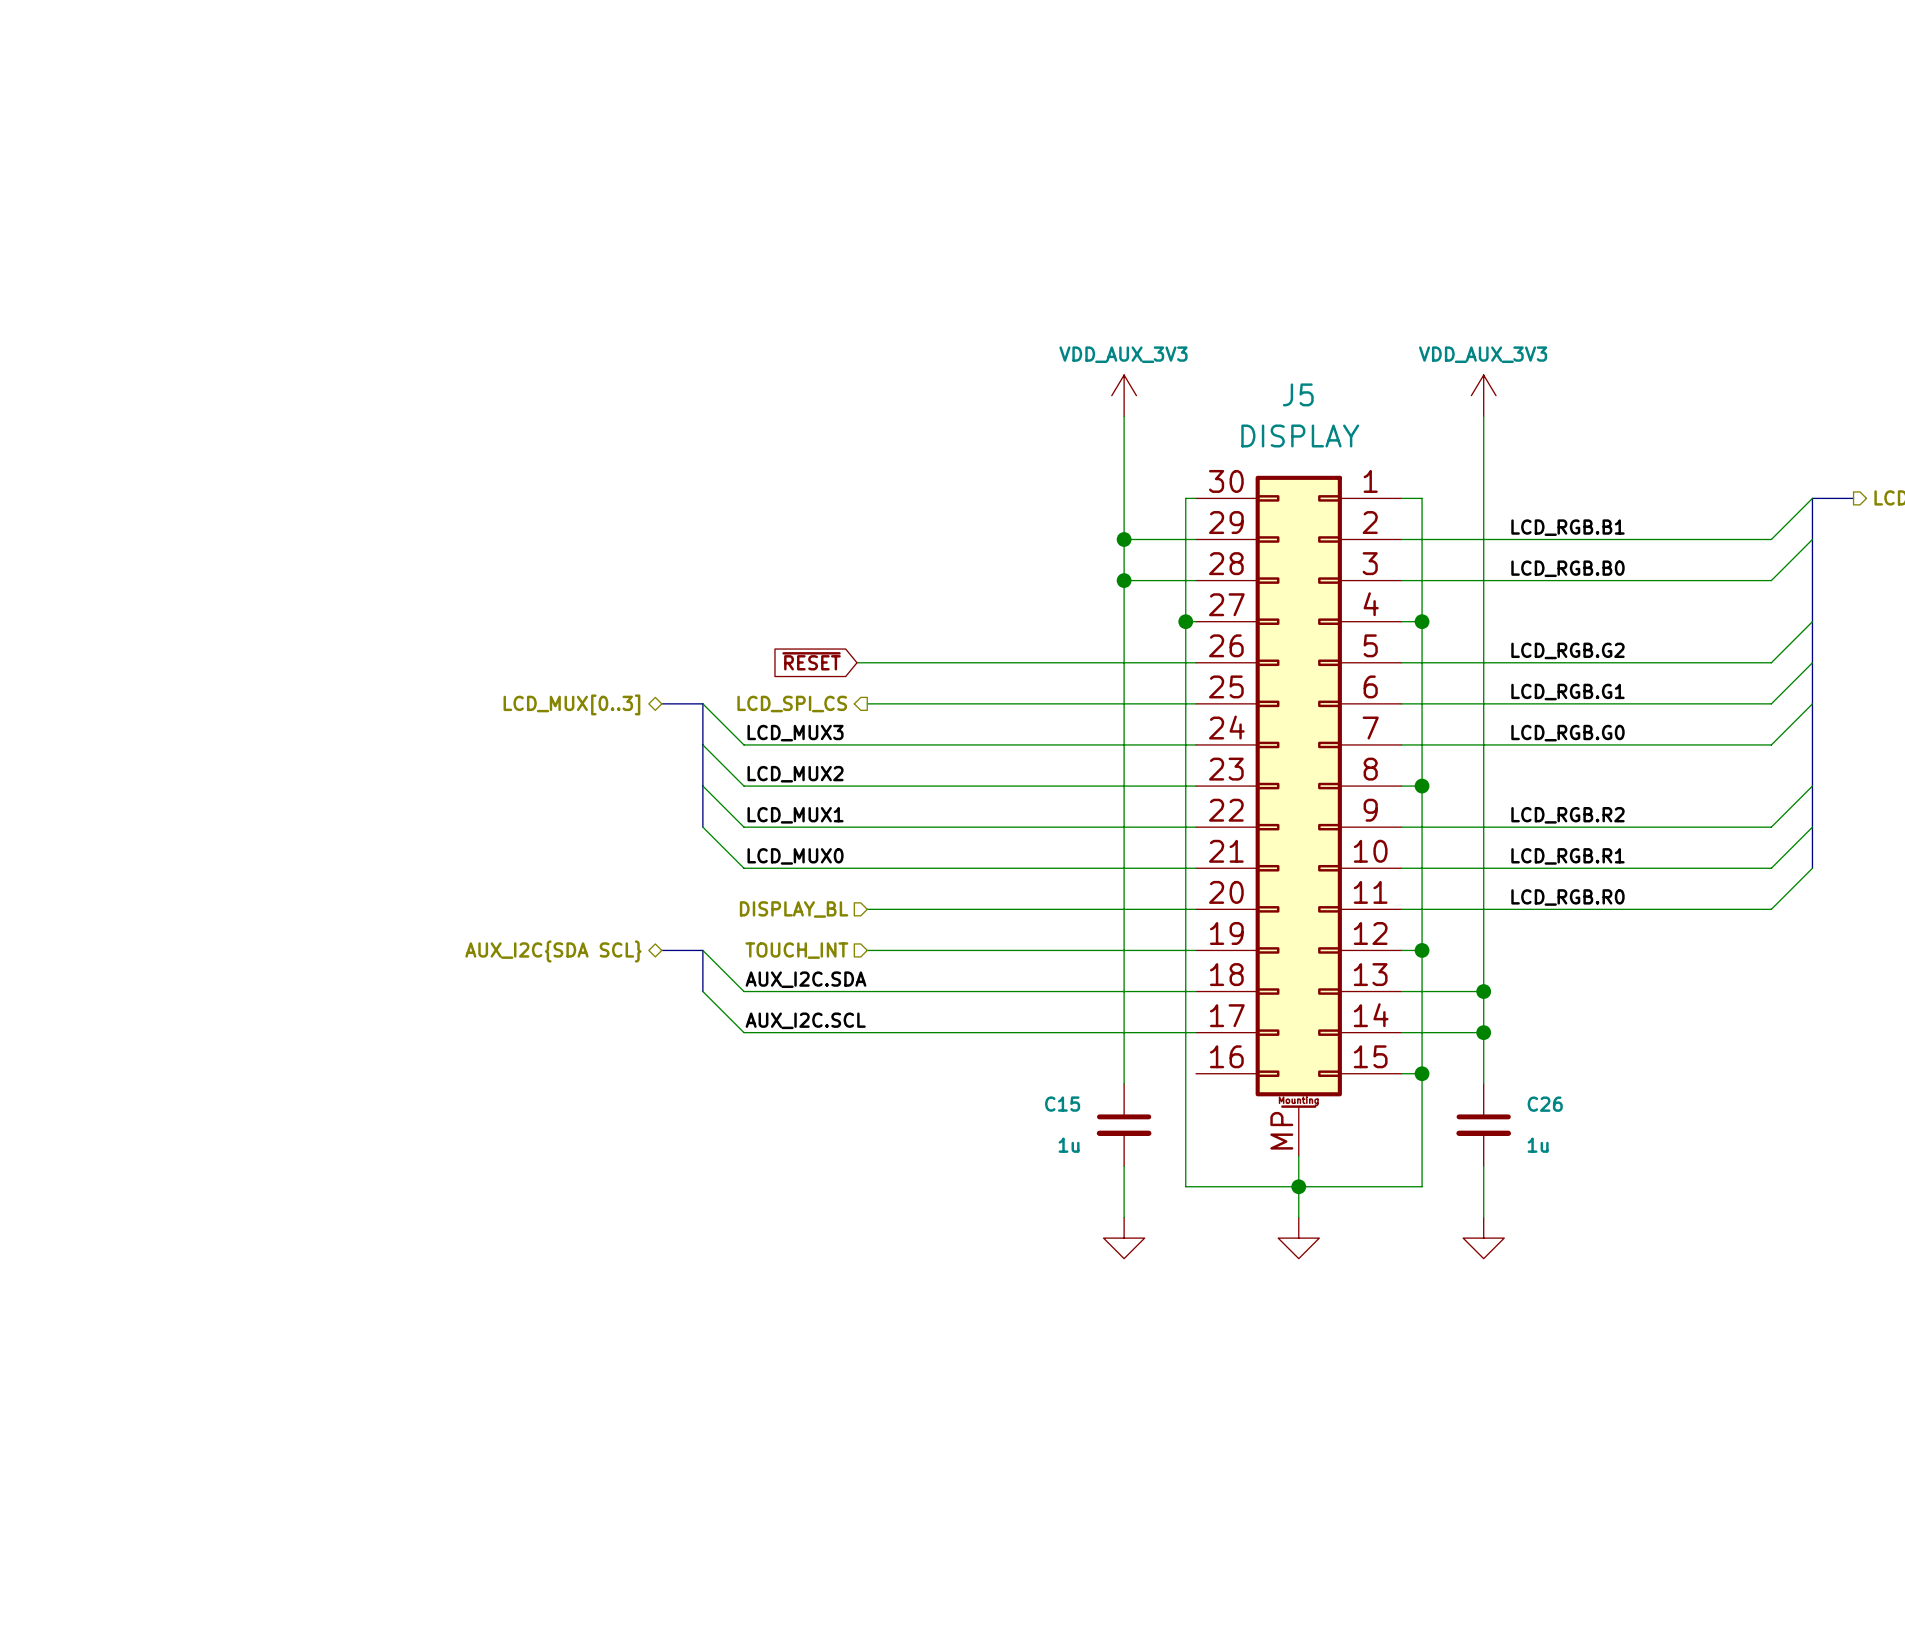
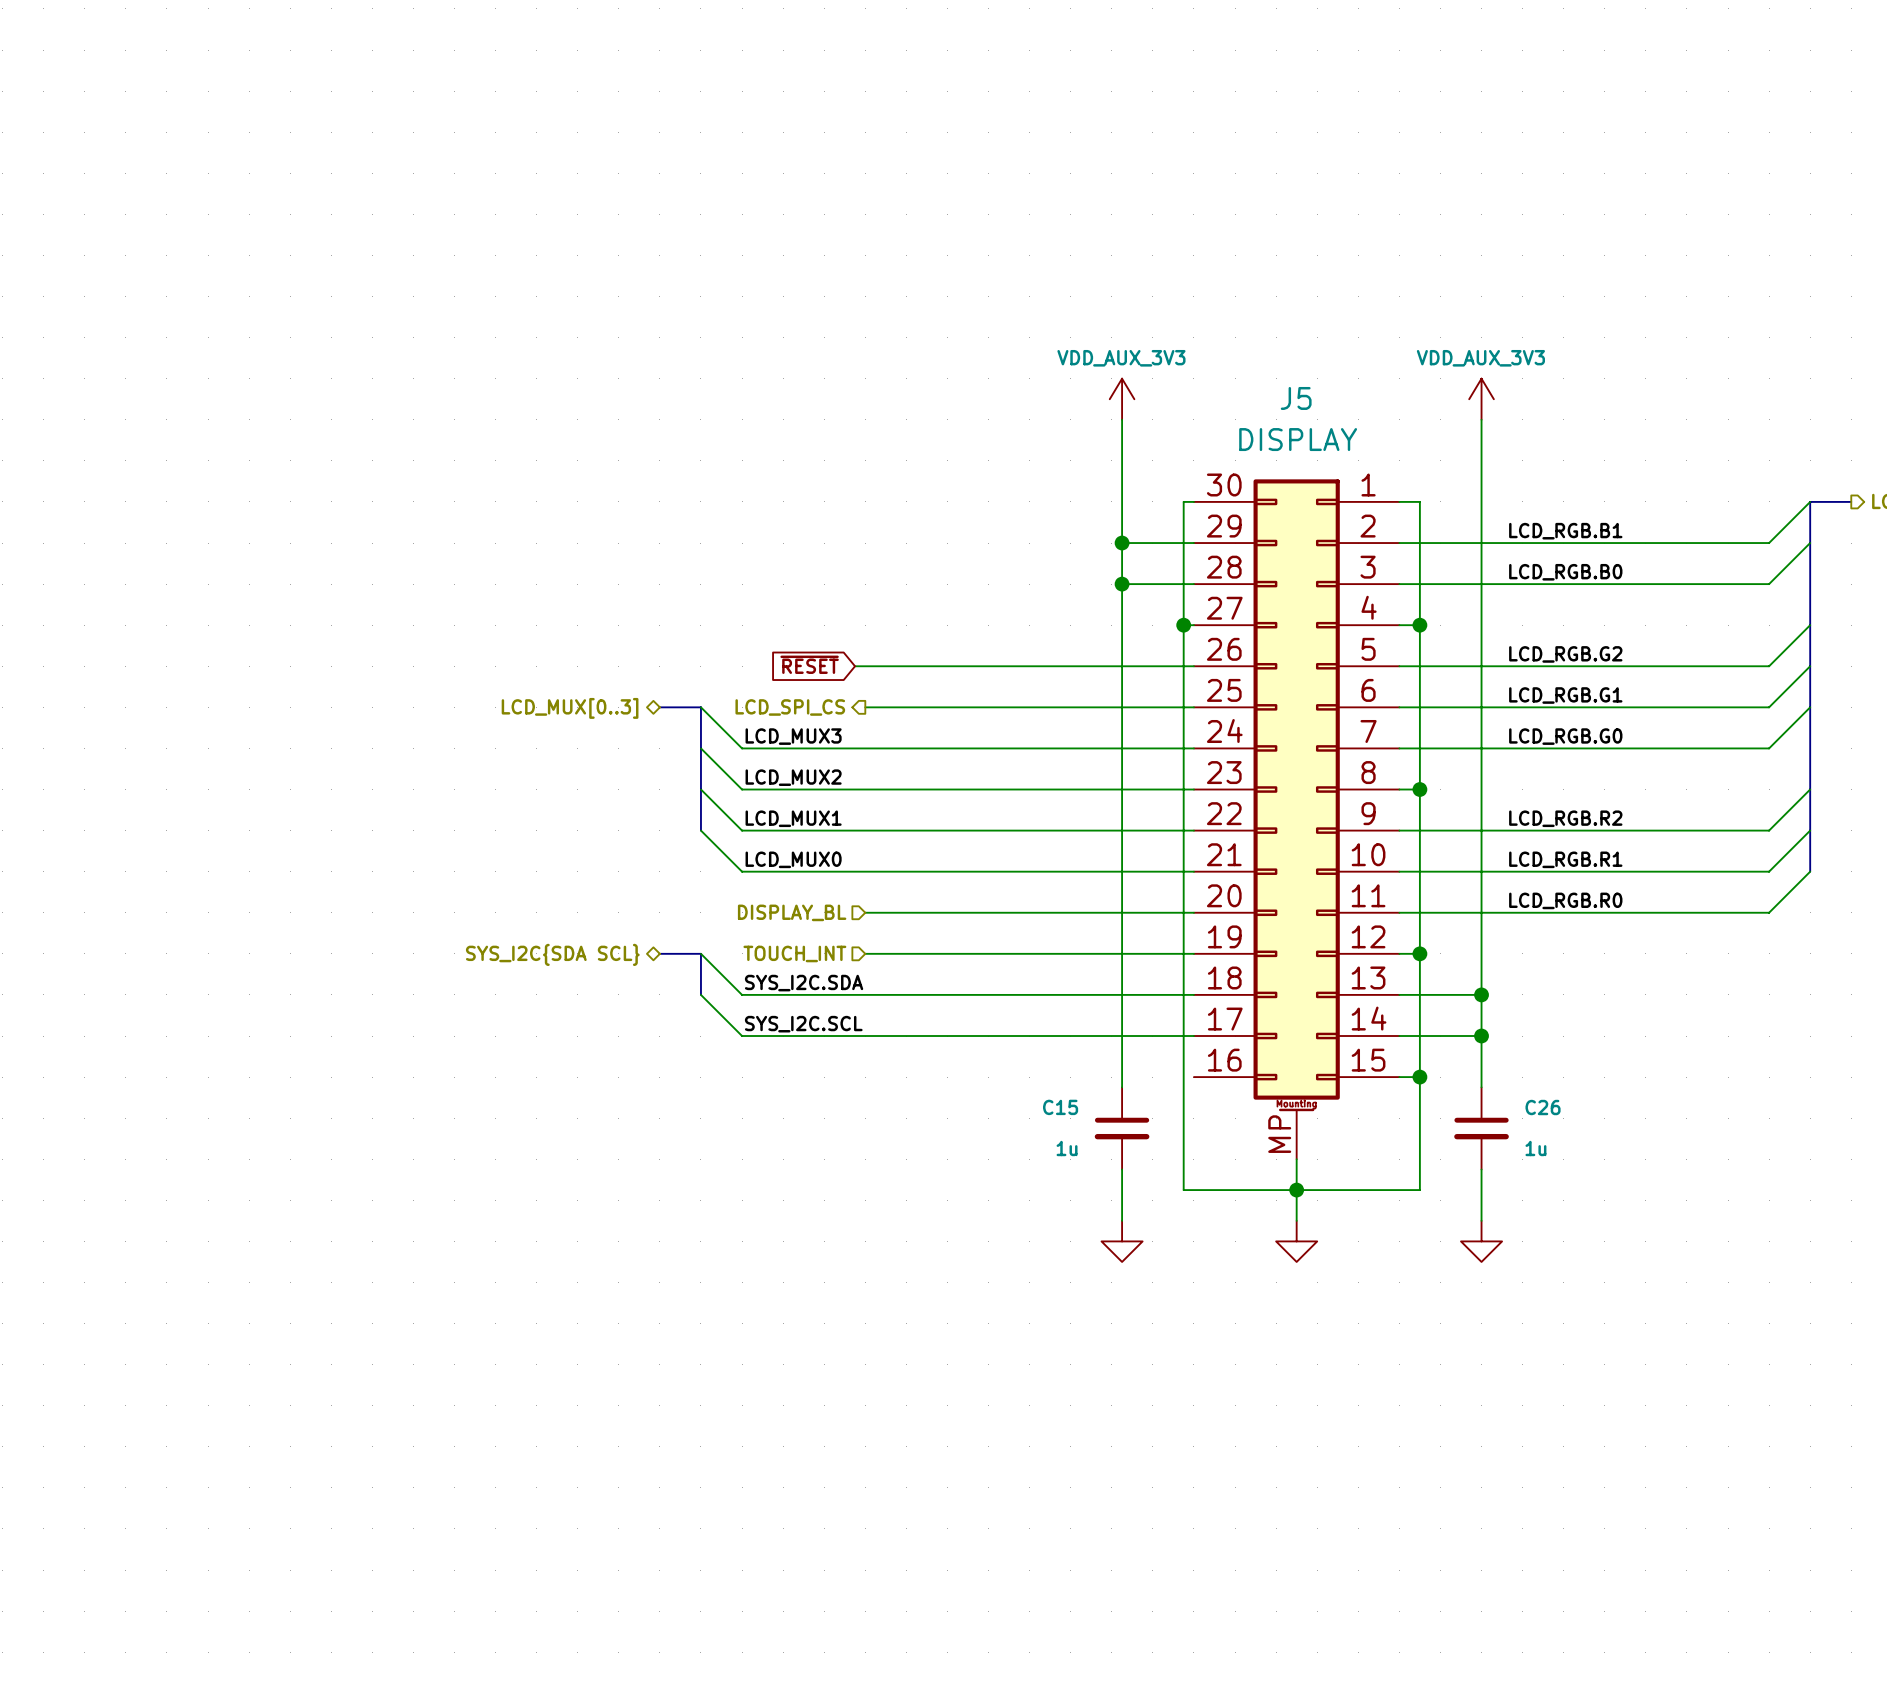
hierarchical label: AUX_I2C{SDA SCL} (553, 951) -> SYS_I2C{SDA SCL} (552, 954)
label: AUX_I2C.SDA (806, 979) -> SYS_I2C.SDA (804, 983)
label: AUX_I2C.SCL (805, 1020) -> SYS_I2C.SCL (803, 1024)

